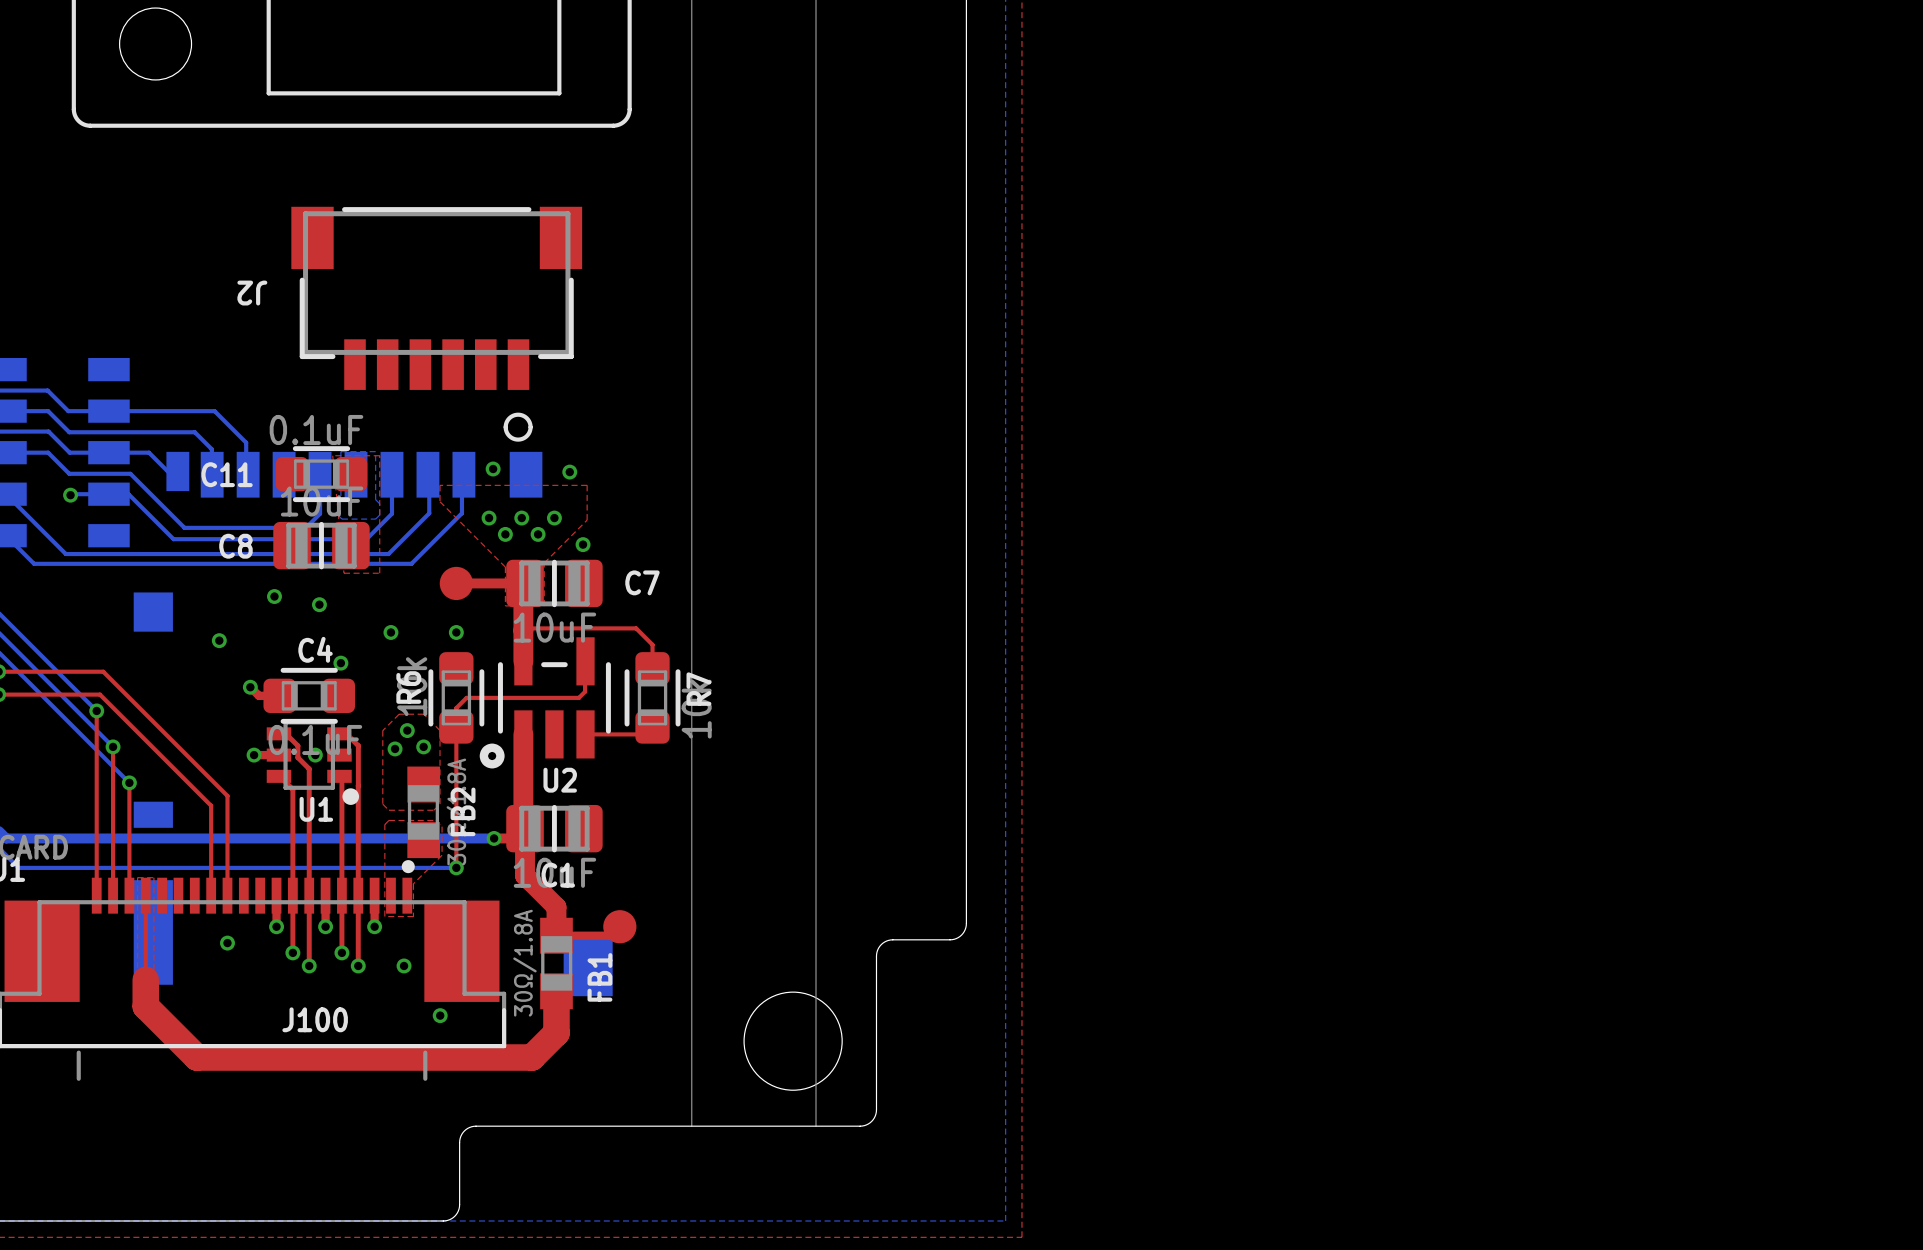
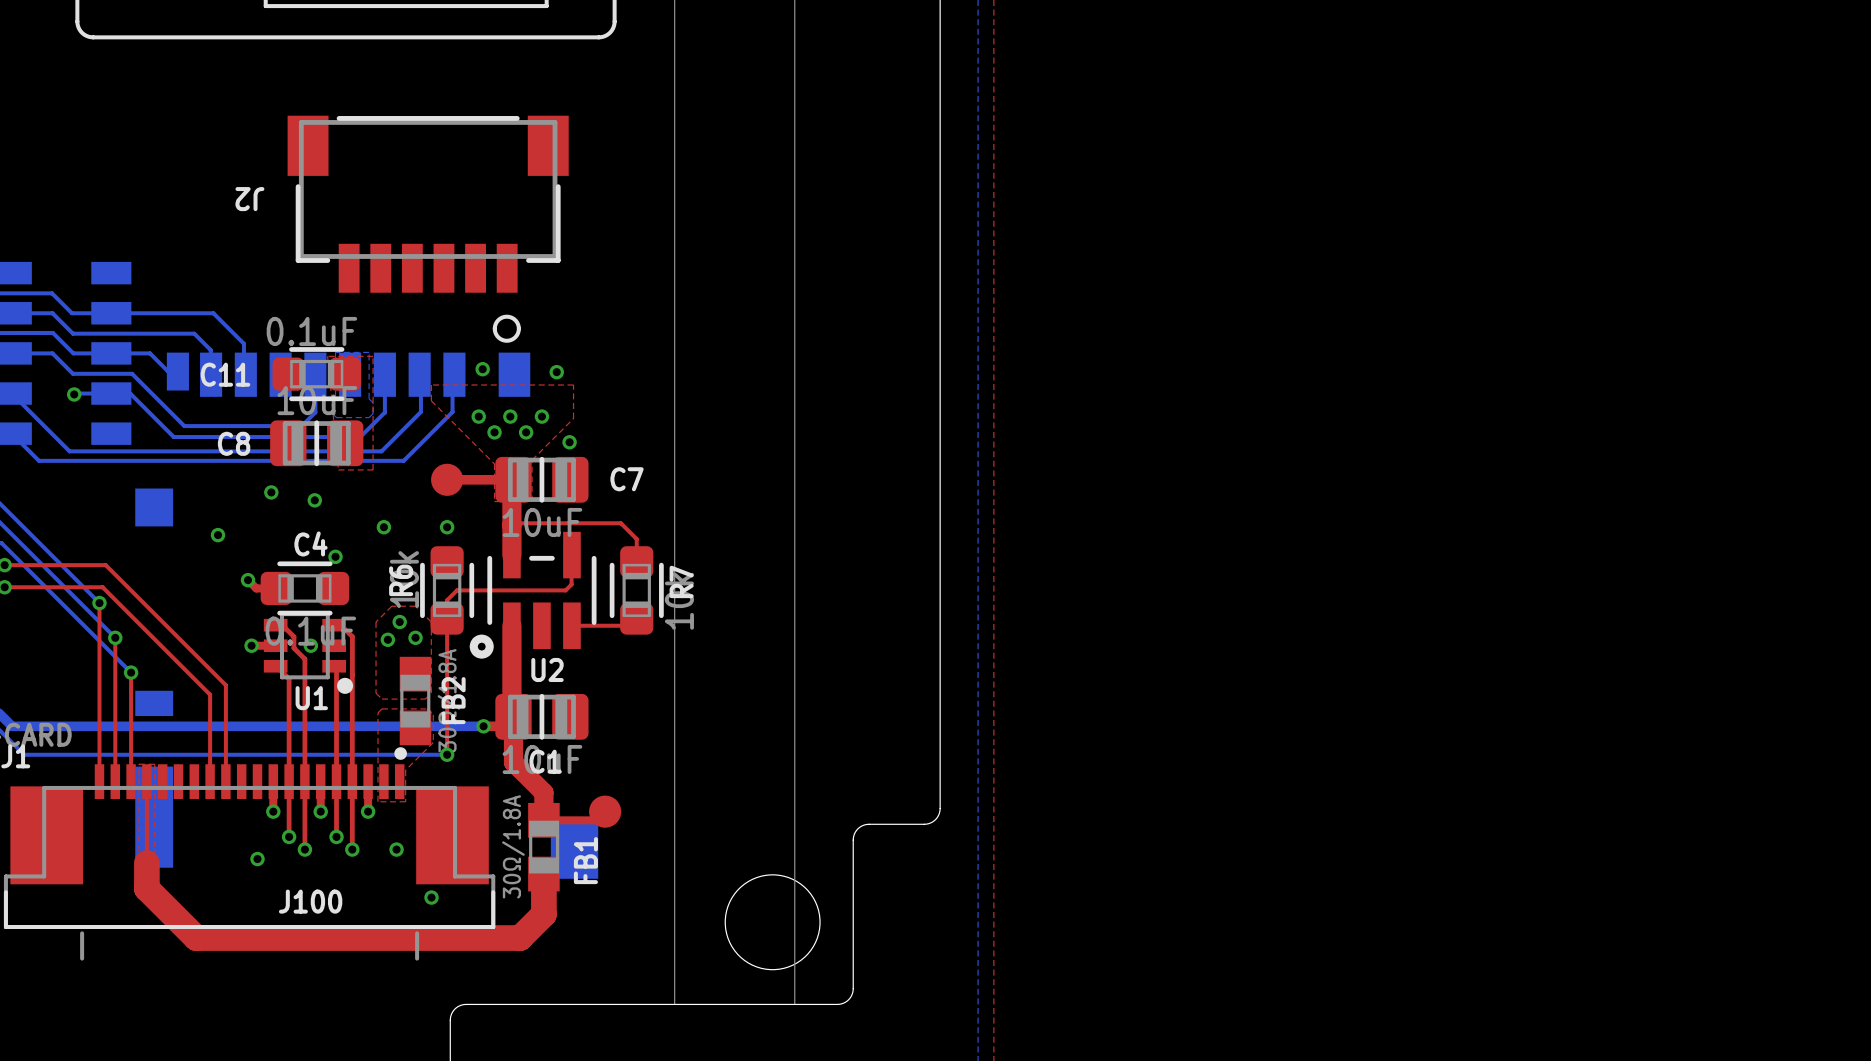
via position: (227, 943) -> (257, 859)

